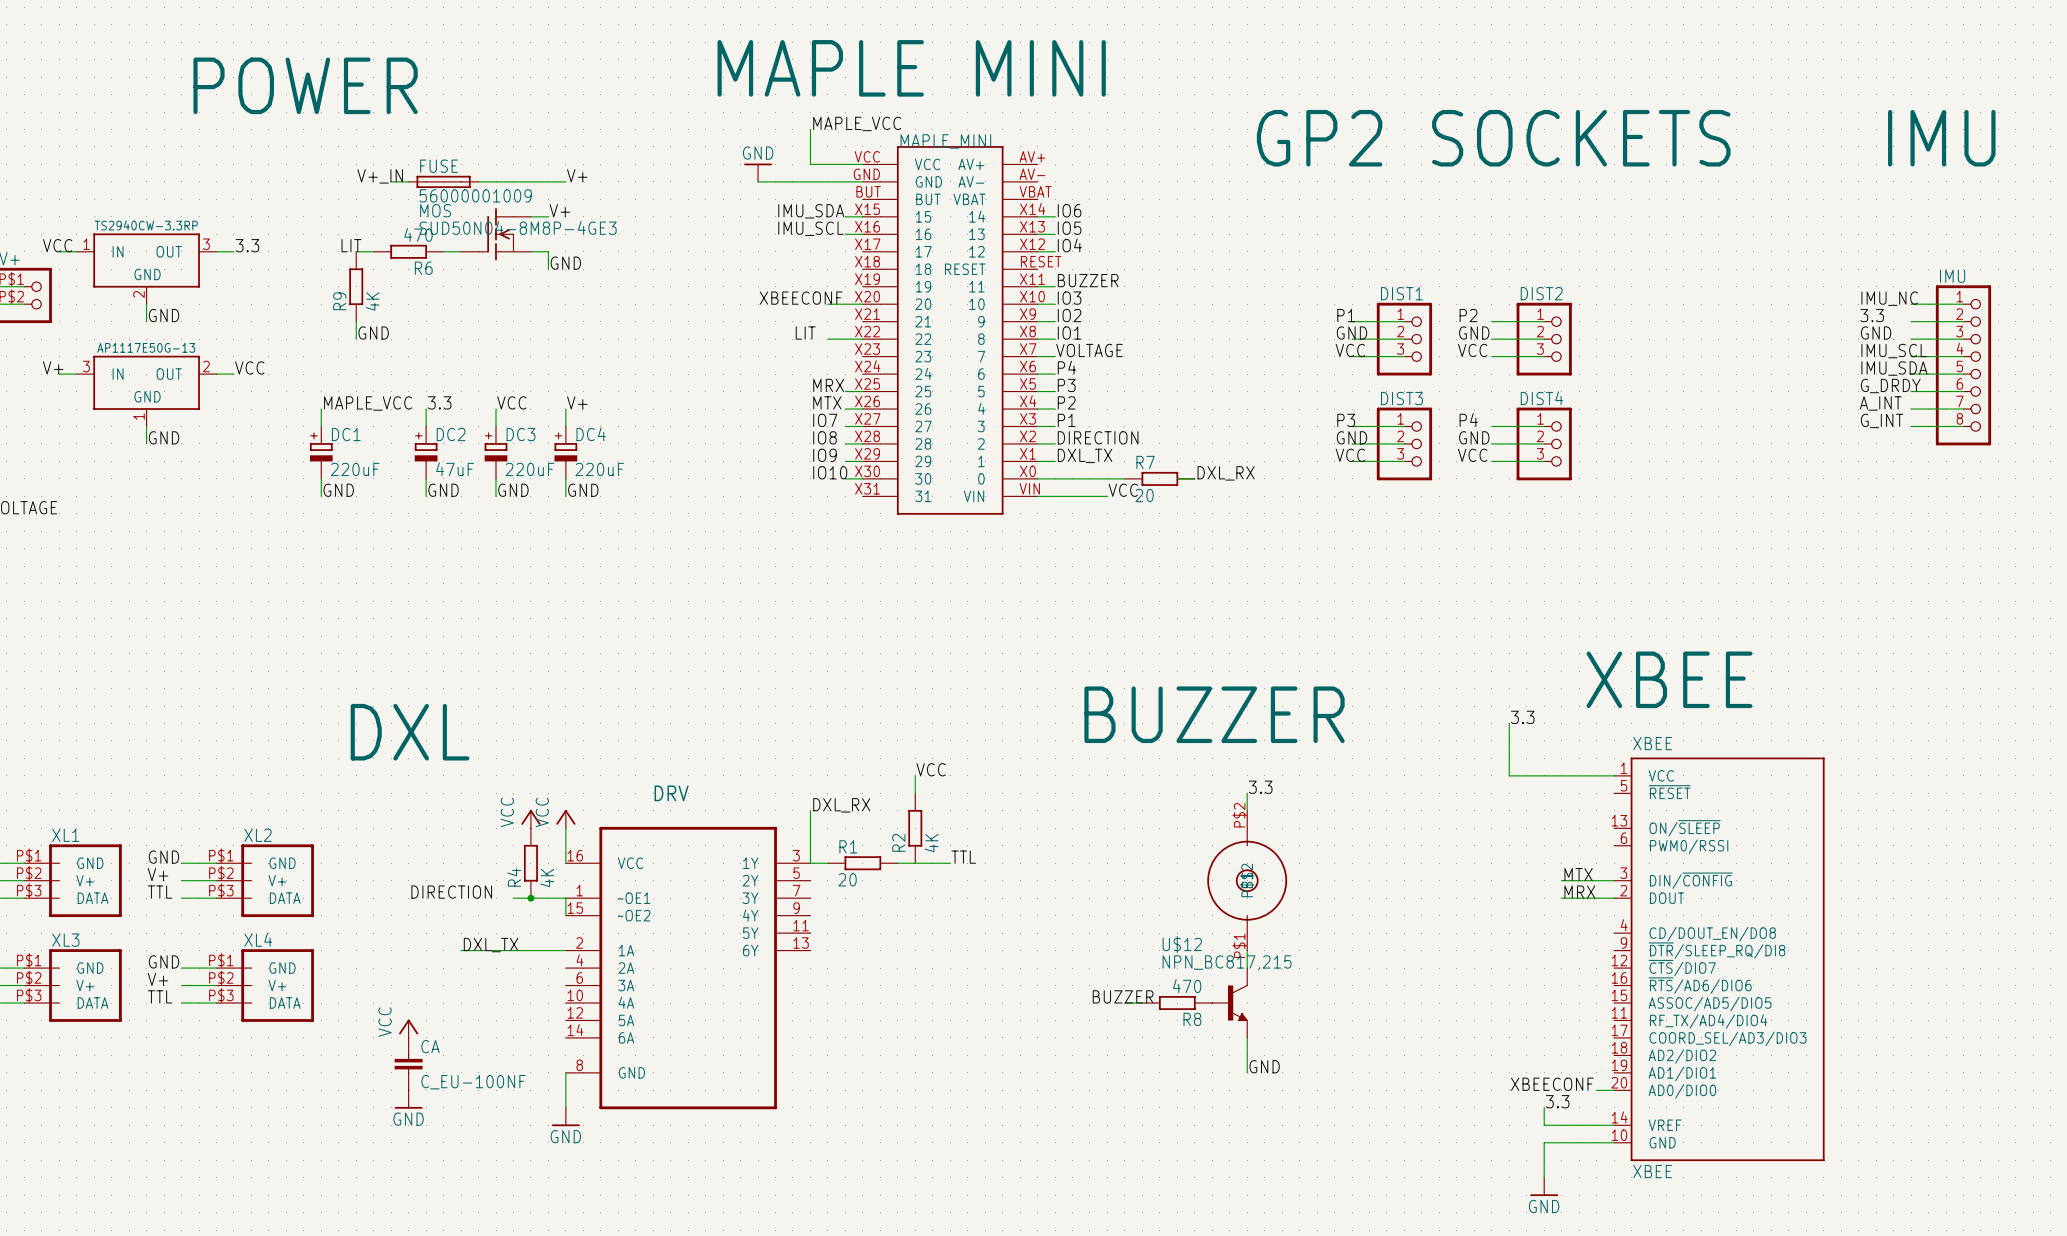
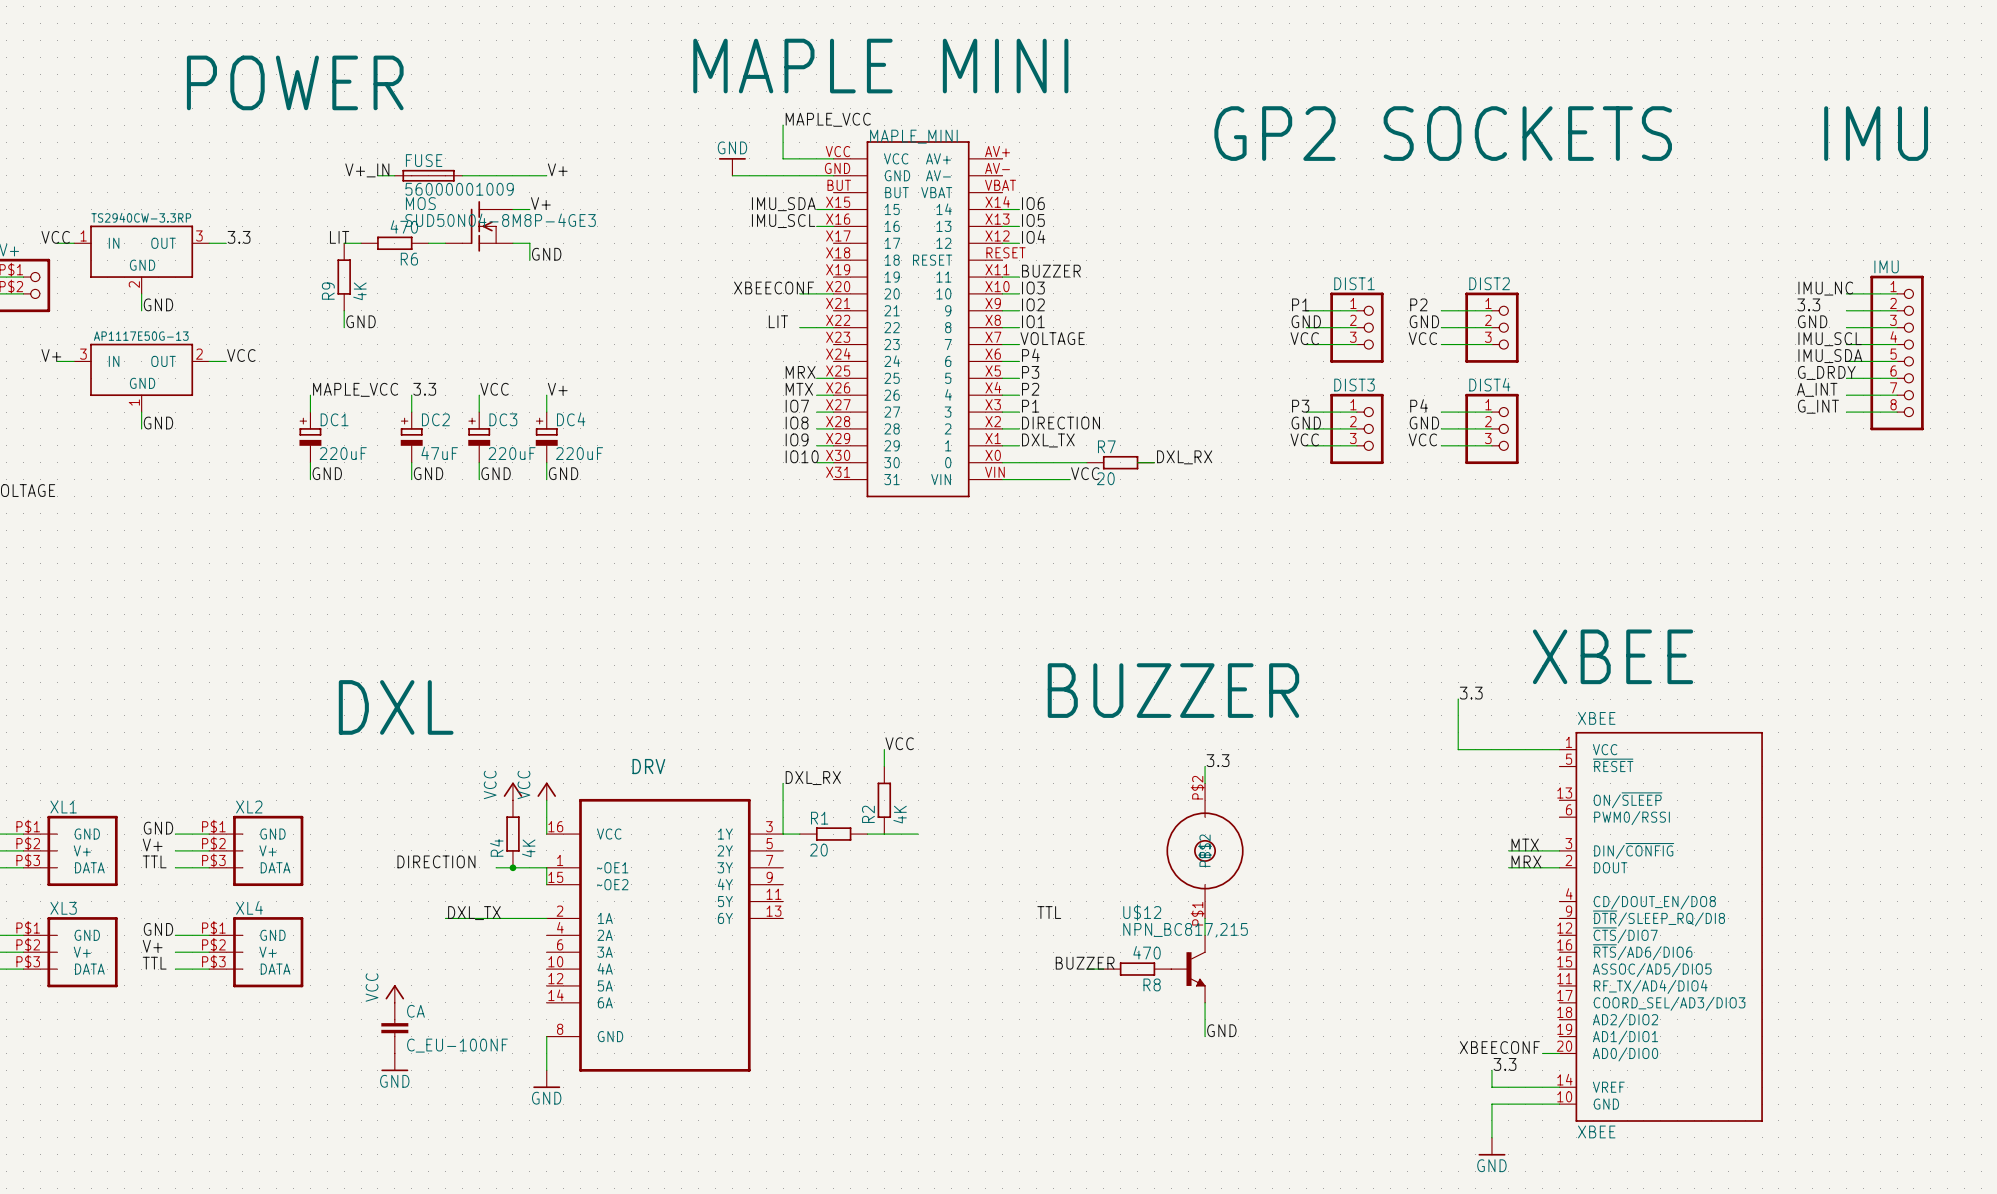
label position: TTL (963, 857) -> TTL (1049, 912)

